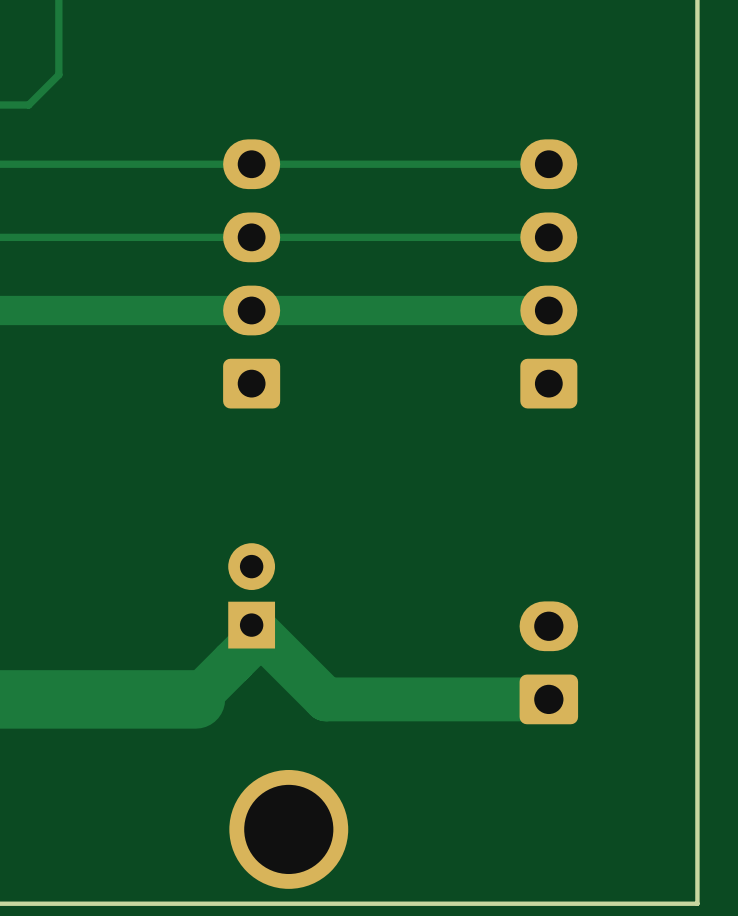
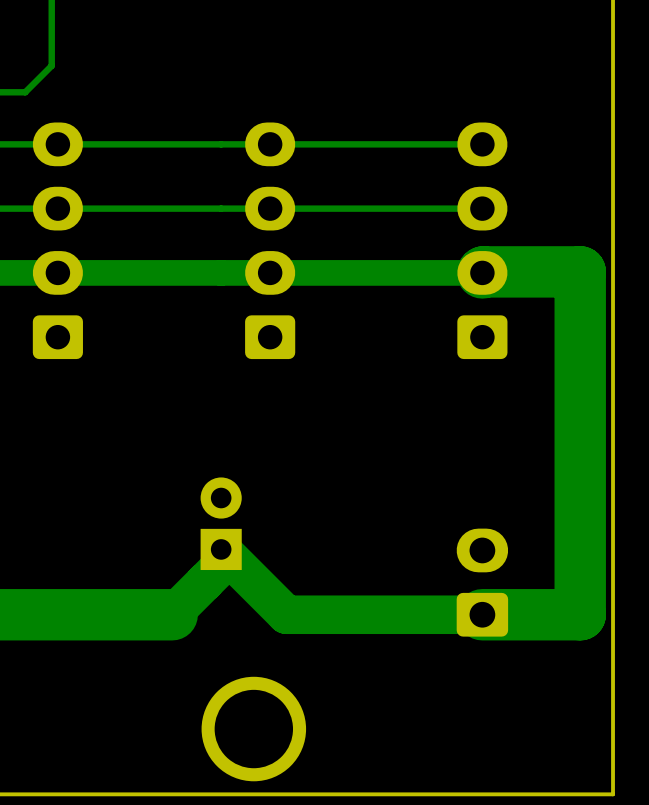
part: none -> (57, 240)
part position: (251, 273) -> (270, 240)
track: none -> (482, 272) (580, 271) (580, 614) (482, 614)

